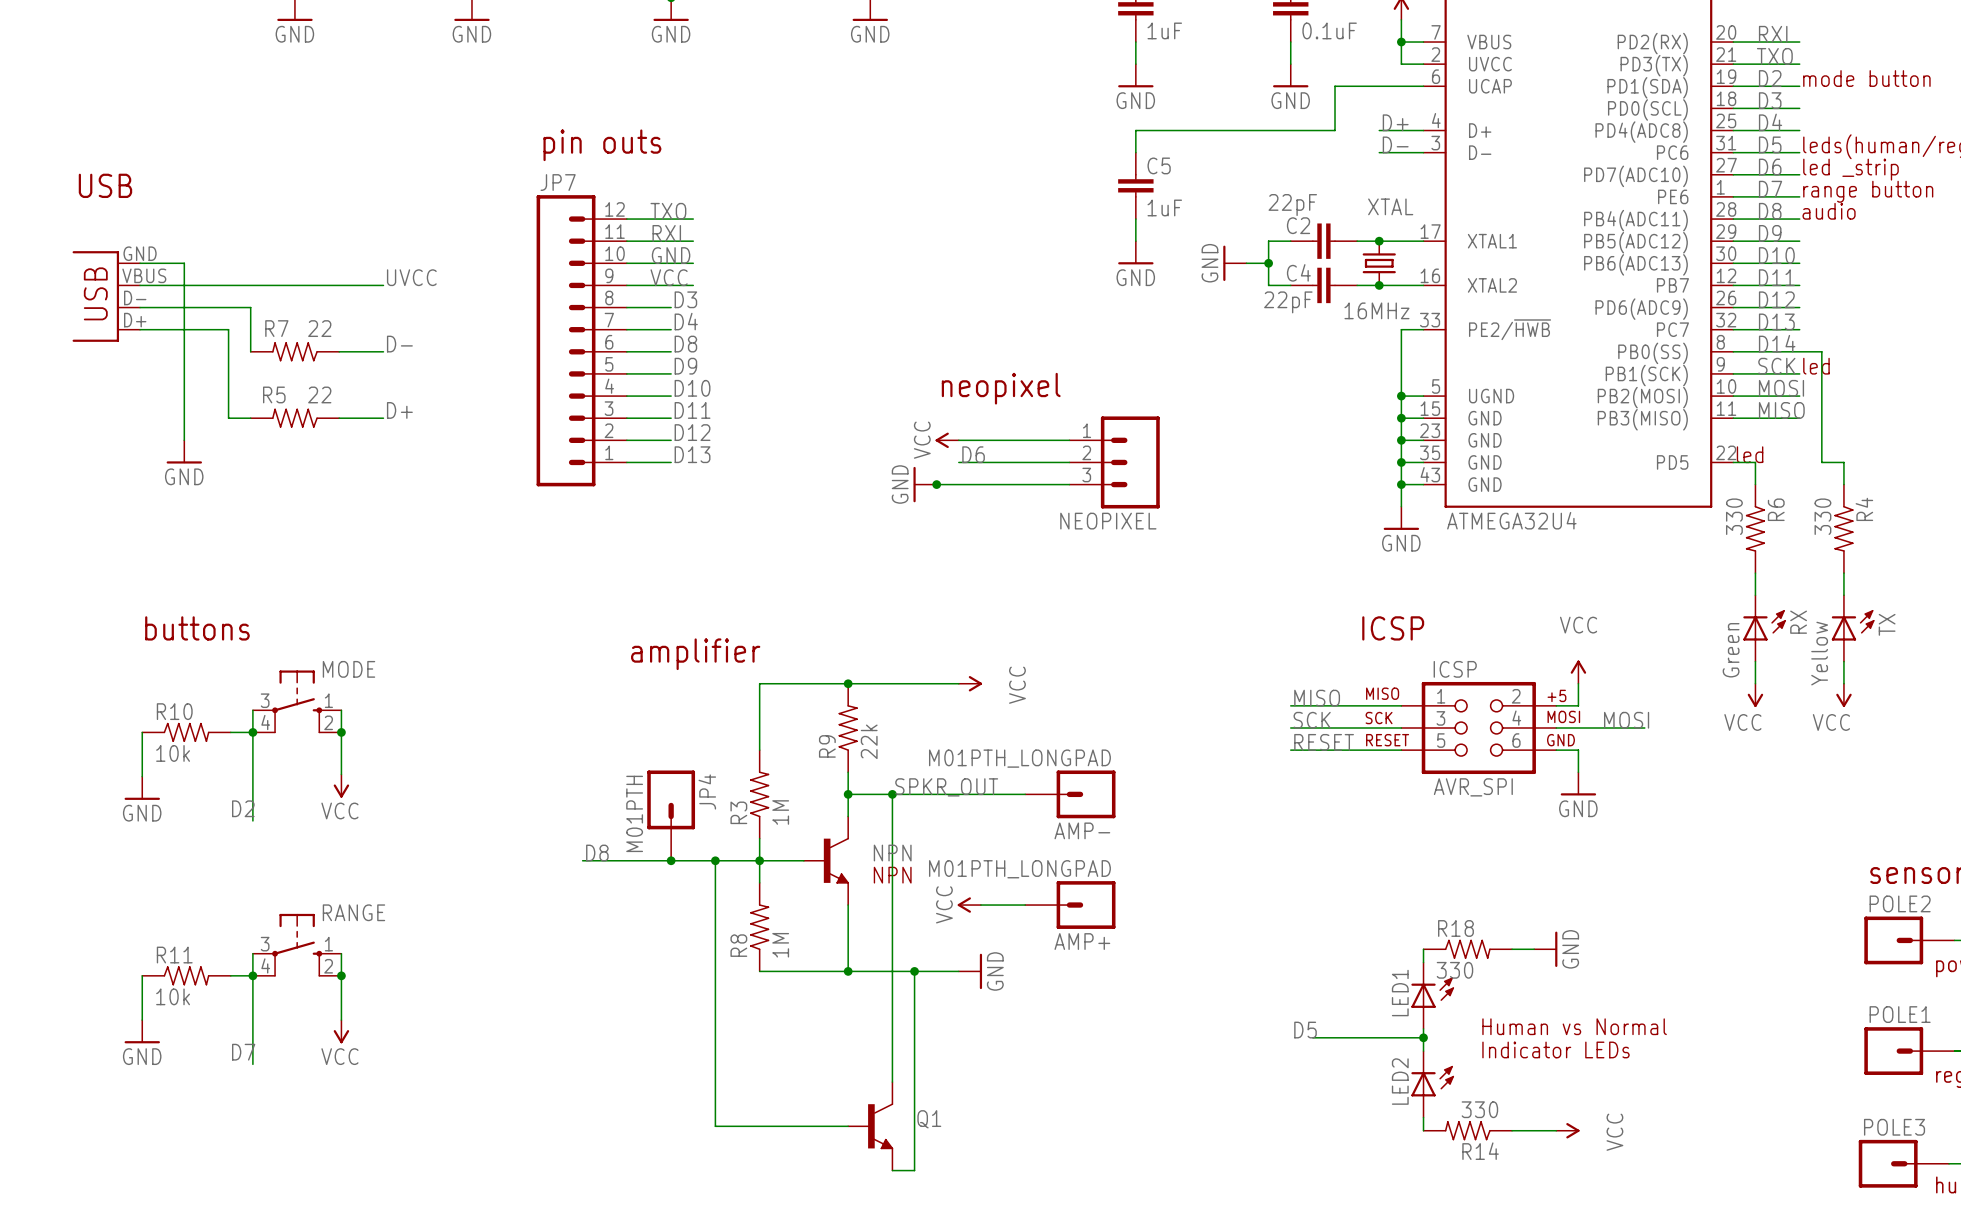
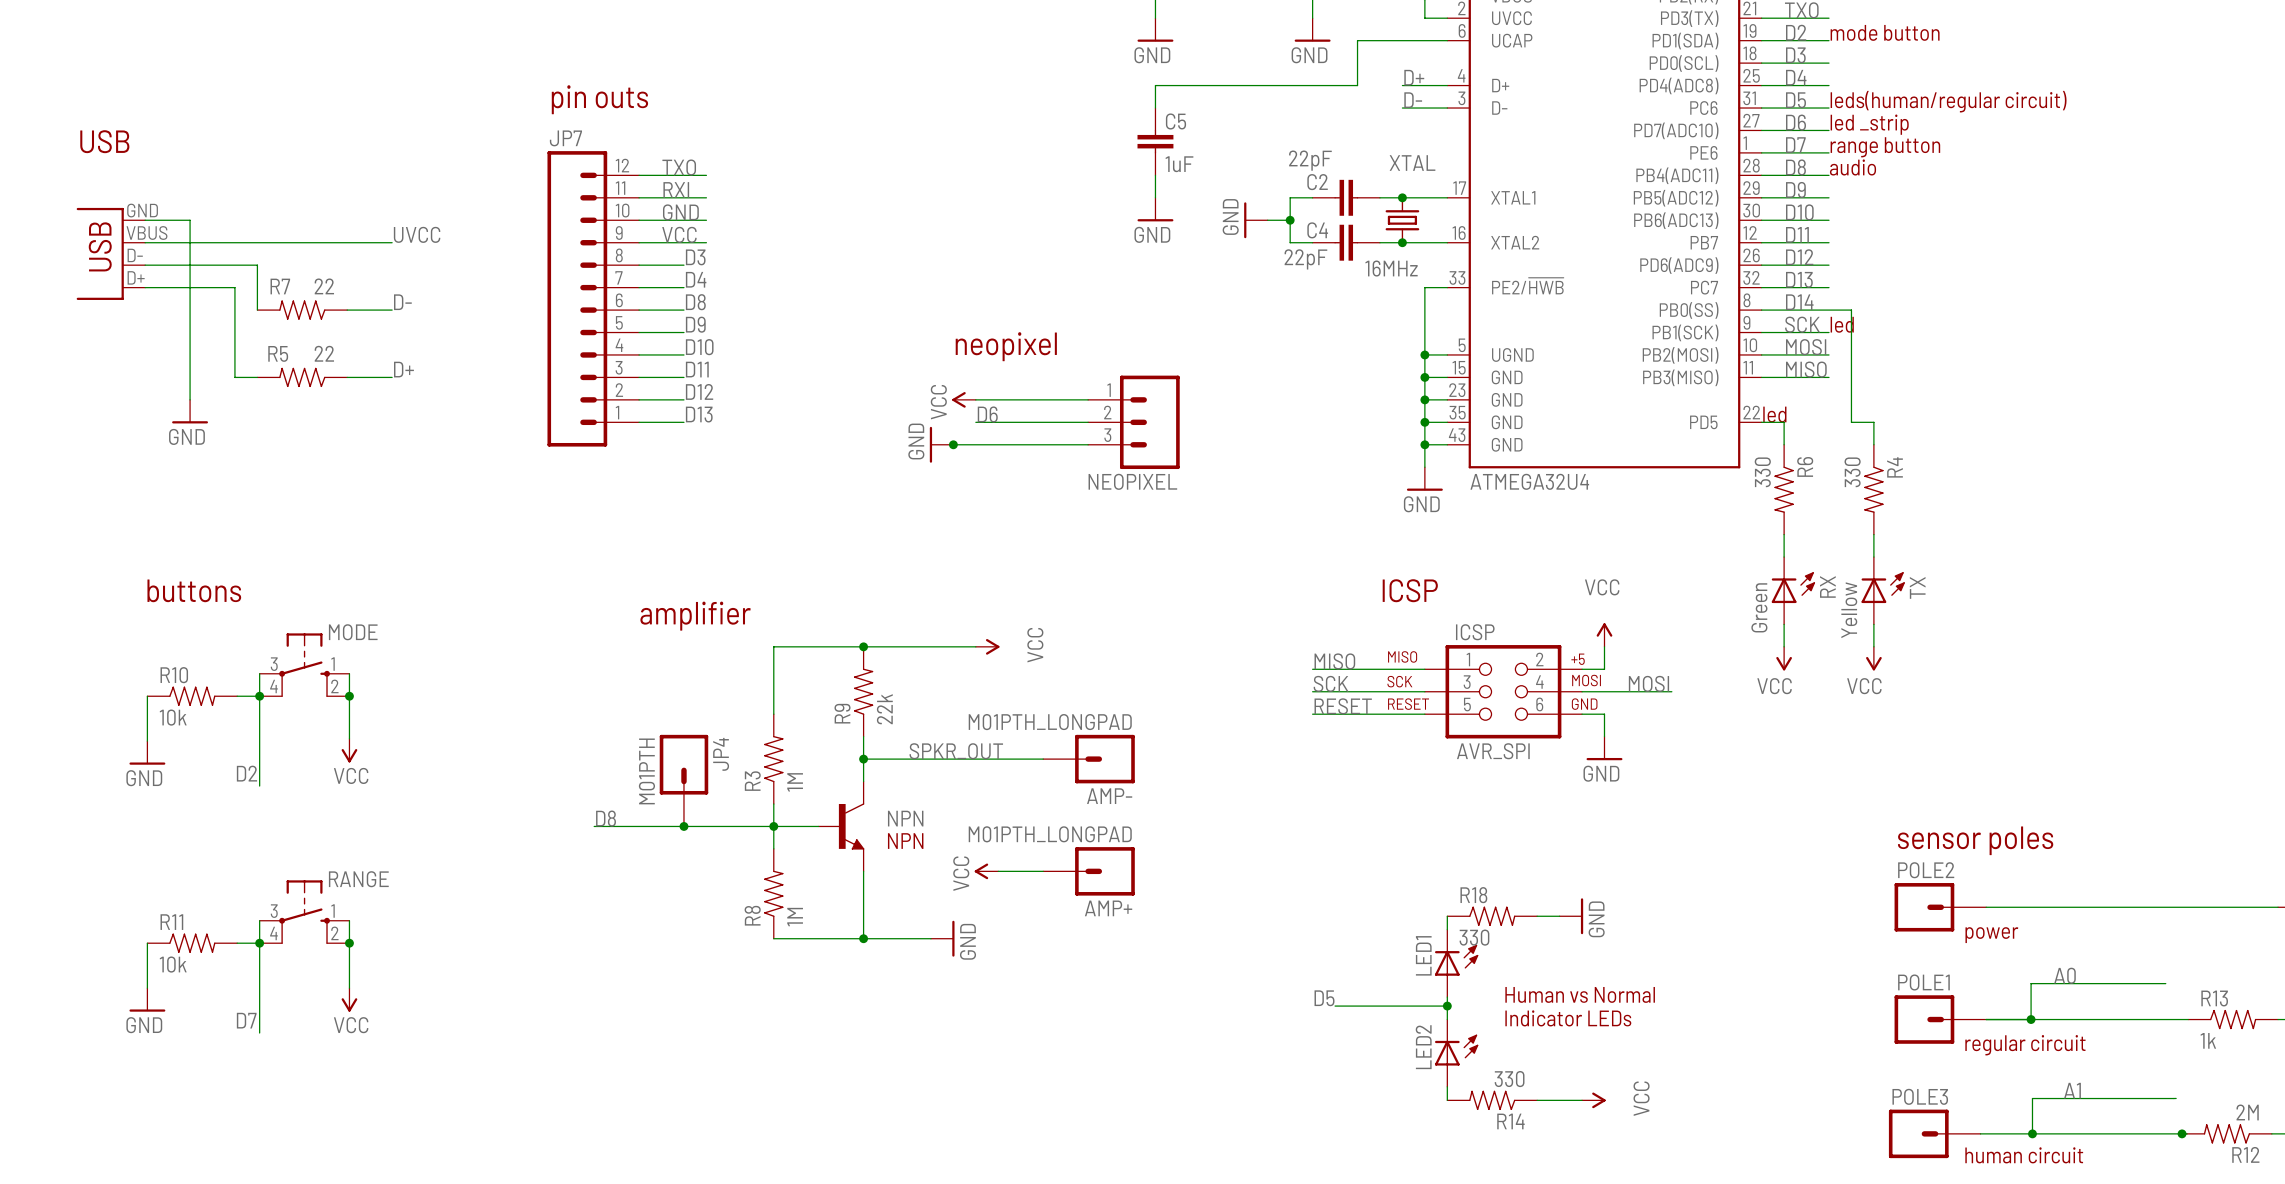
wire: (892, 794) (892, 1082) -> none
junction: (892, 794) -> none
wire: (715, 860) (715, 1126) (848, 1126) -> none
junction: (715, 860) -> none
junction: (914, 971) -> none
wire: (958, 971) (914, 971) (914, 1170) (892, 1170) -> none
power symbol position: GND (970, 971) -> GND (942, 938)
Q1: (870, 1126) -> none

